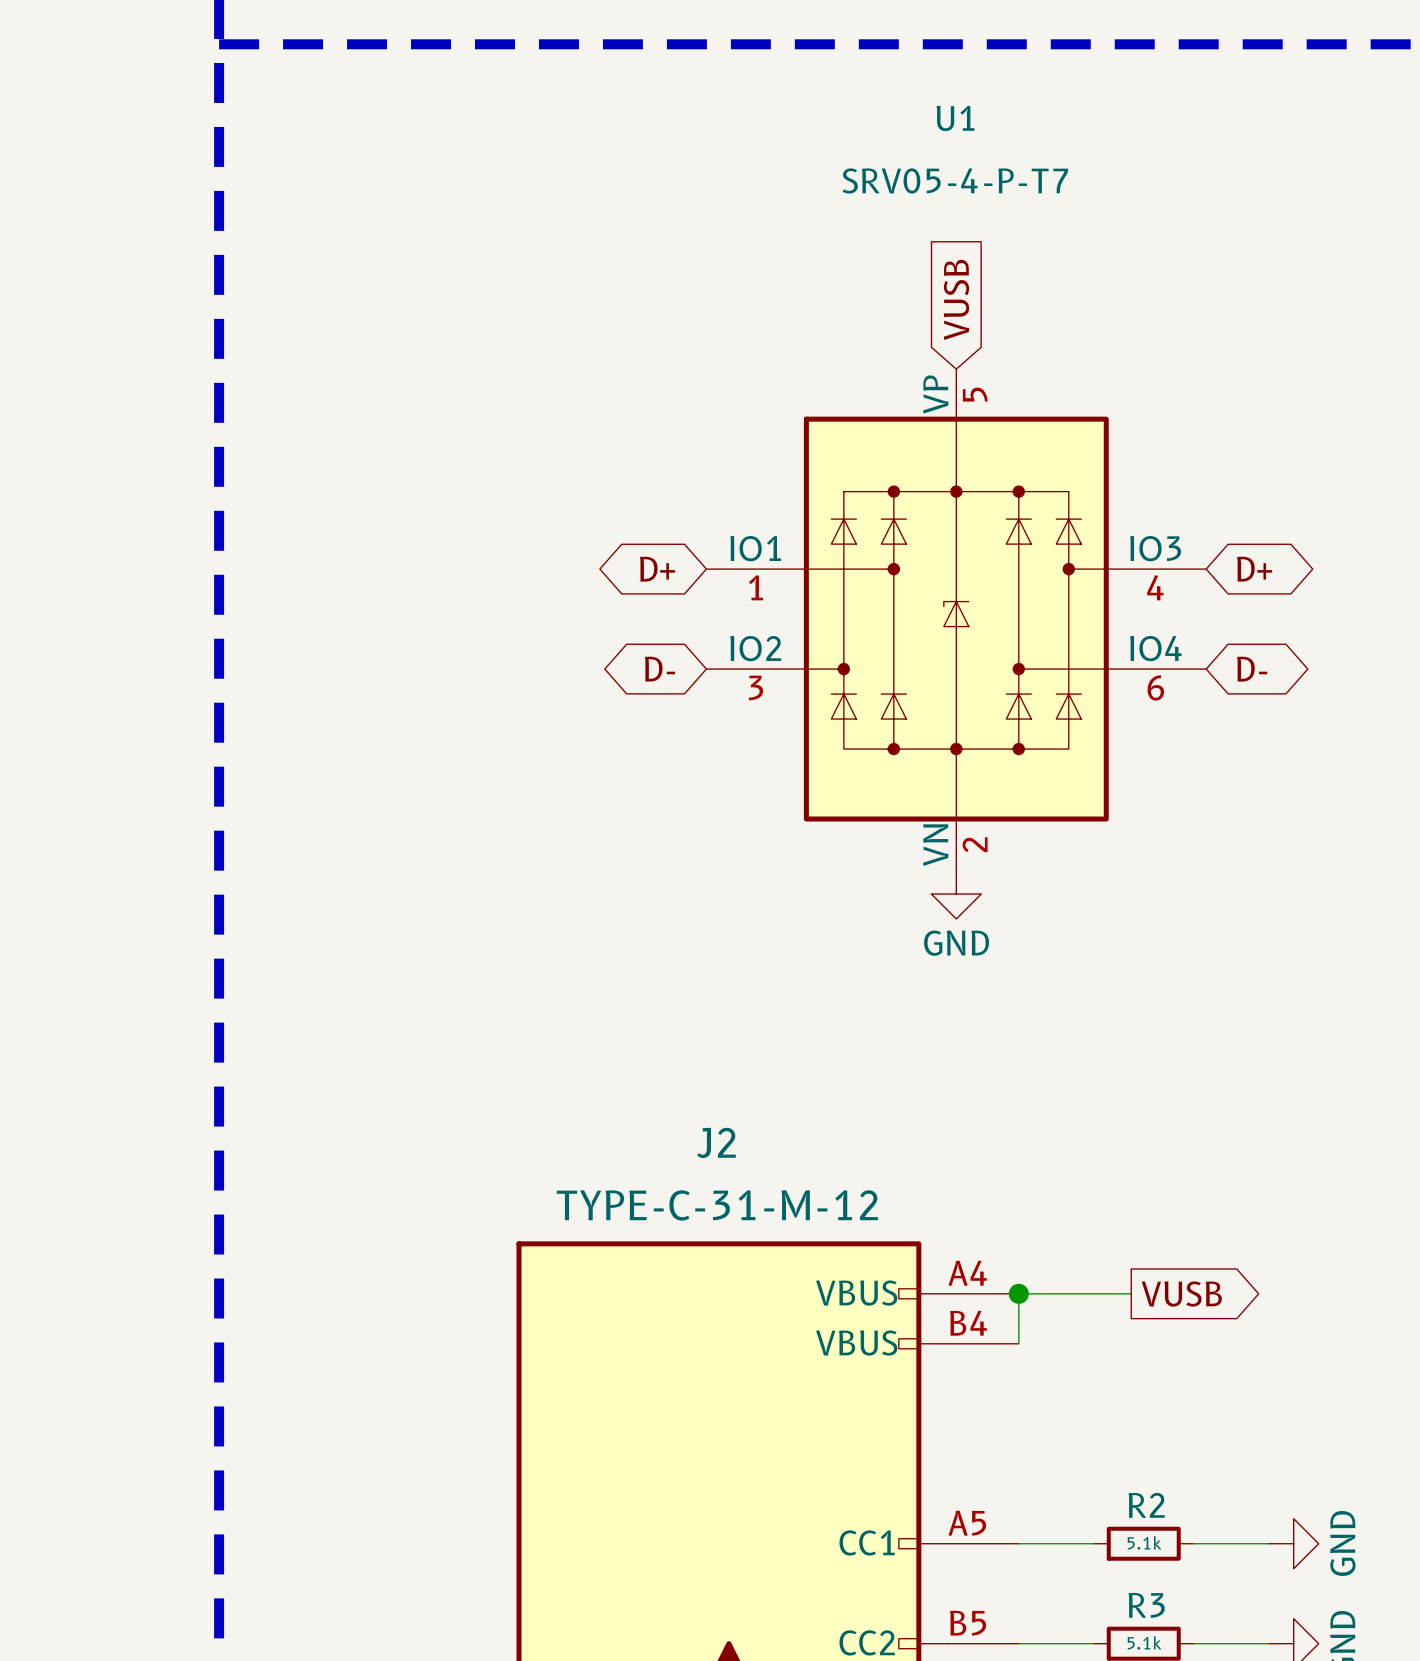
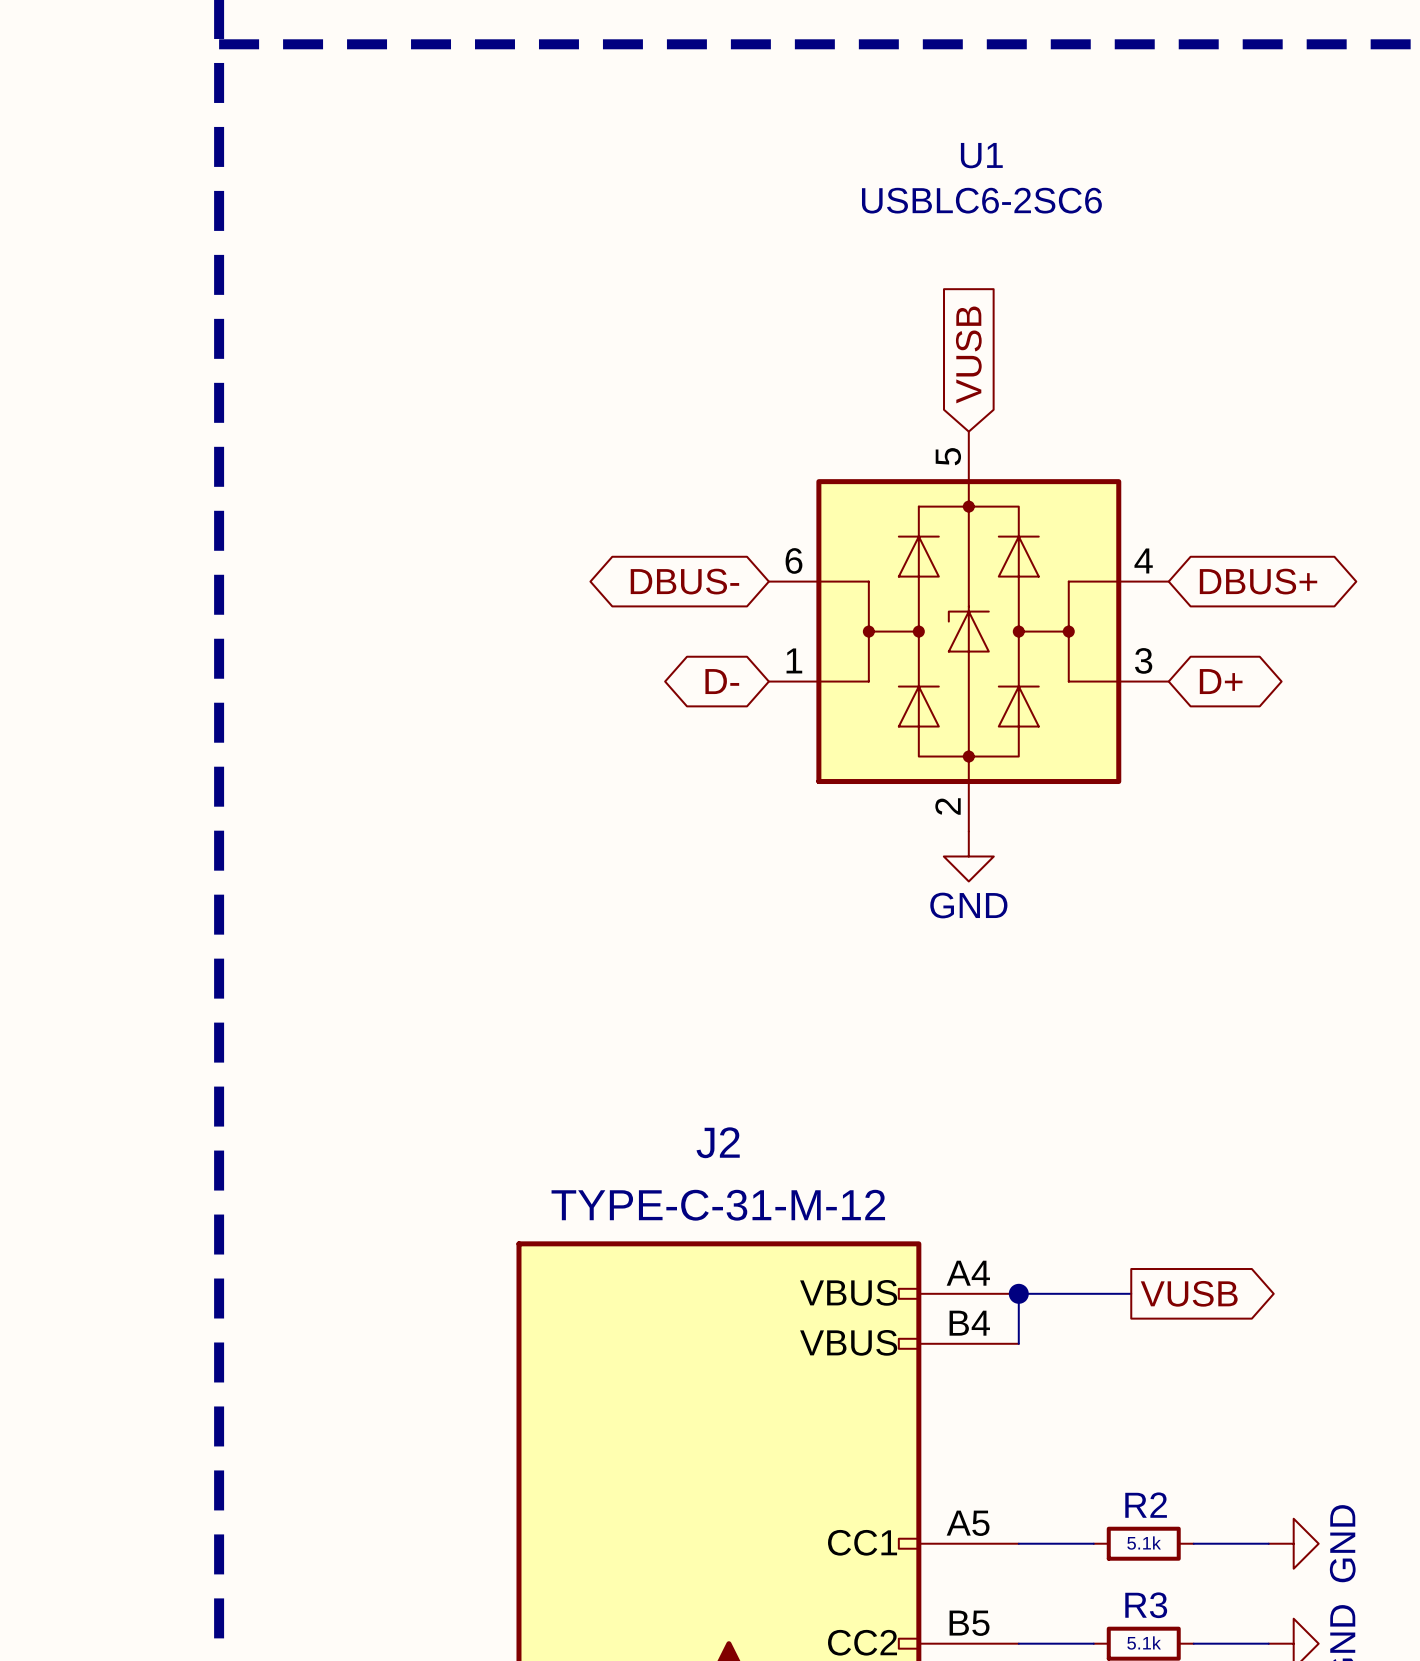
U1 value: SRV05-4-P-T7 (955, 180) -> USBLC6-2SC6 (981, 200)
global label position: VUSB (956, 299) -> VUSB (968, 354)
U1 symbol: [706, 369, 1207, 869] -> [768, 431, 1169, 832]
global label: D+ (657, 569) -> none
global label position: D+ (1254, 569) -> D+ (1221, 681)
global label: none -> DBUS- (684, 581)
global label: none -> DBUS+ (1258, 581)
global label position: D- (659, 669) -> D- (722, 681)
global label: D- (1252, 669) -> none
power symbol position: GND (956, 893) -> GND (968, 856)

